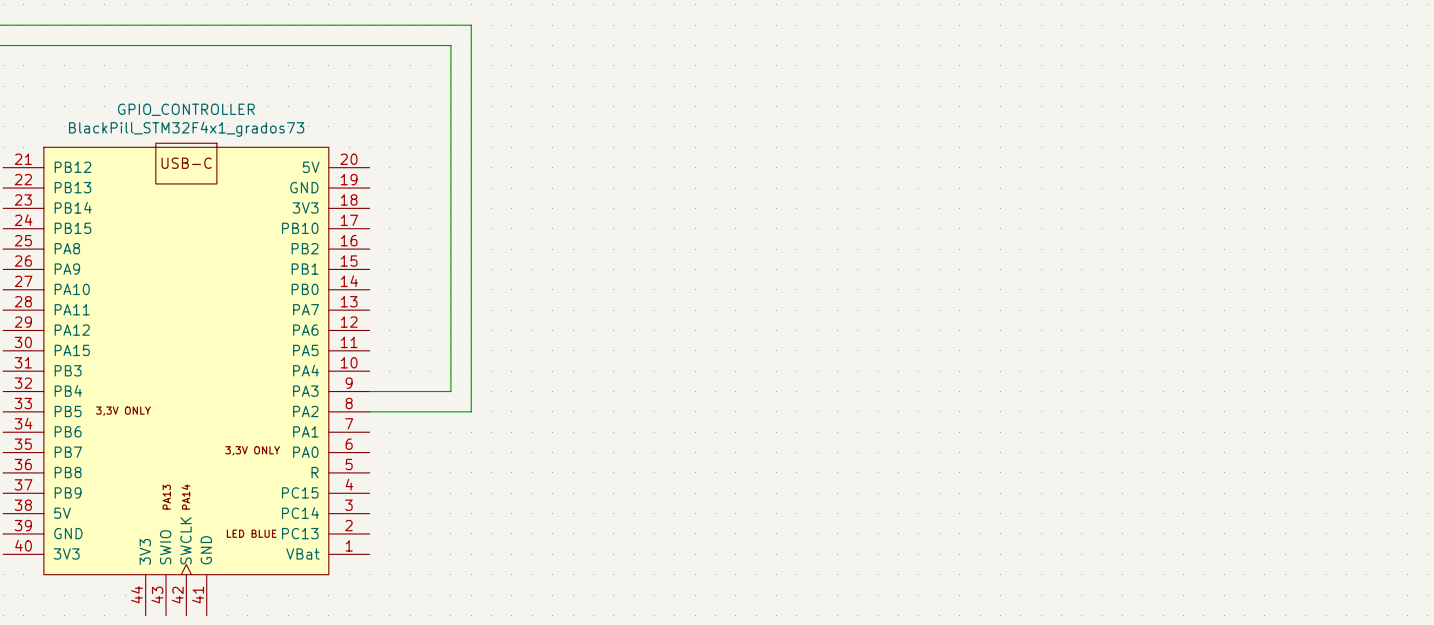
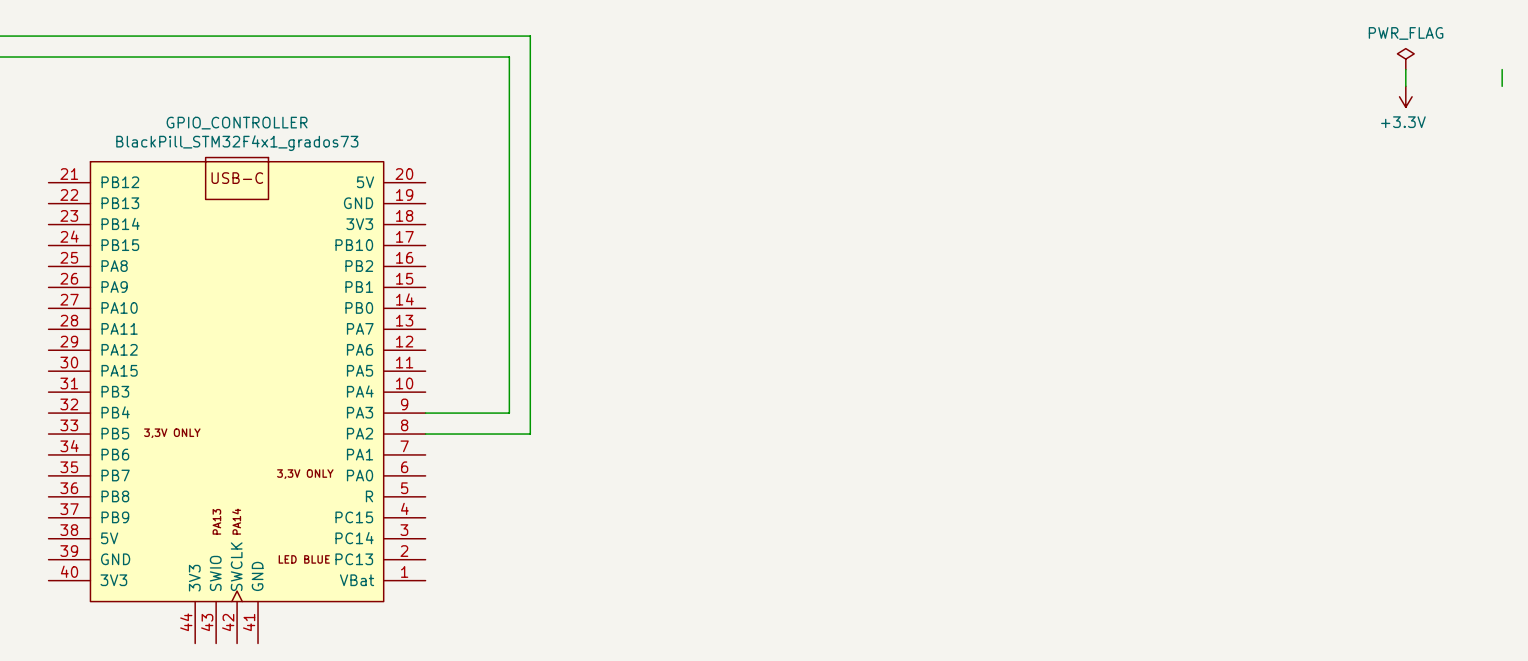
power symbol: none -> PWR_FLAG (1405, 59)
wire: none -> (1405, 69) (1405, 86)
wire: none -> (1502, 69) (1502, 86)
power symbol: none -> +3.3V (1405, 96)

